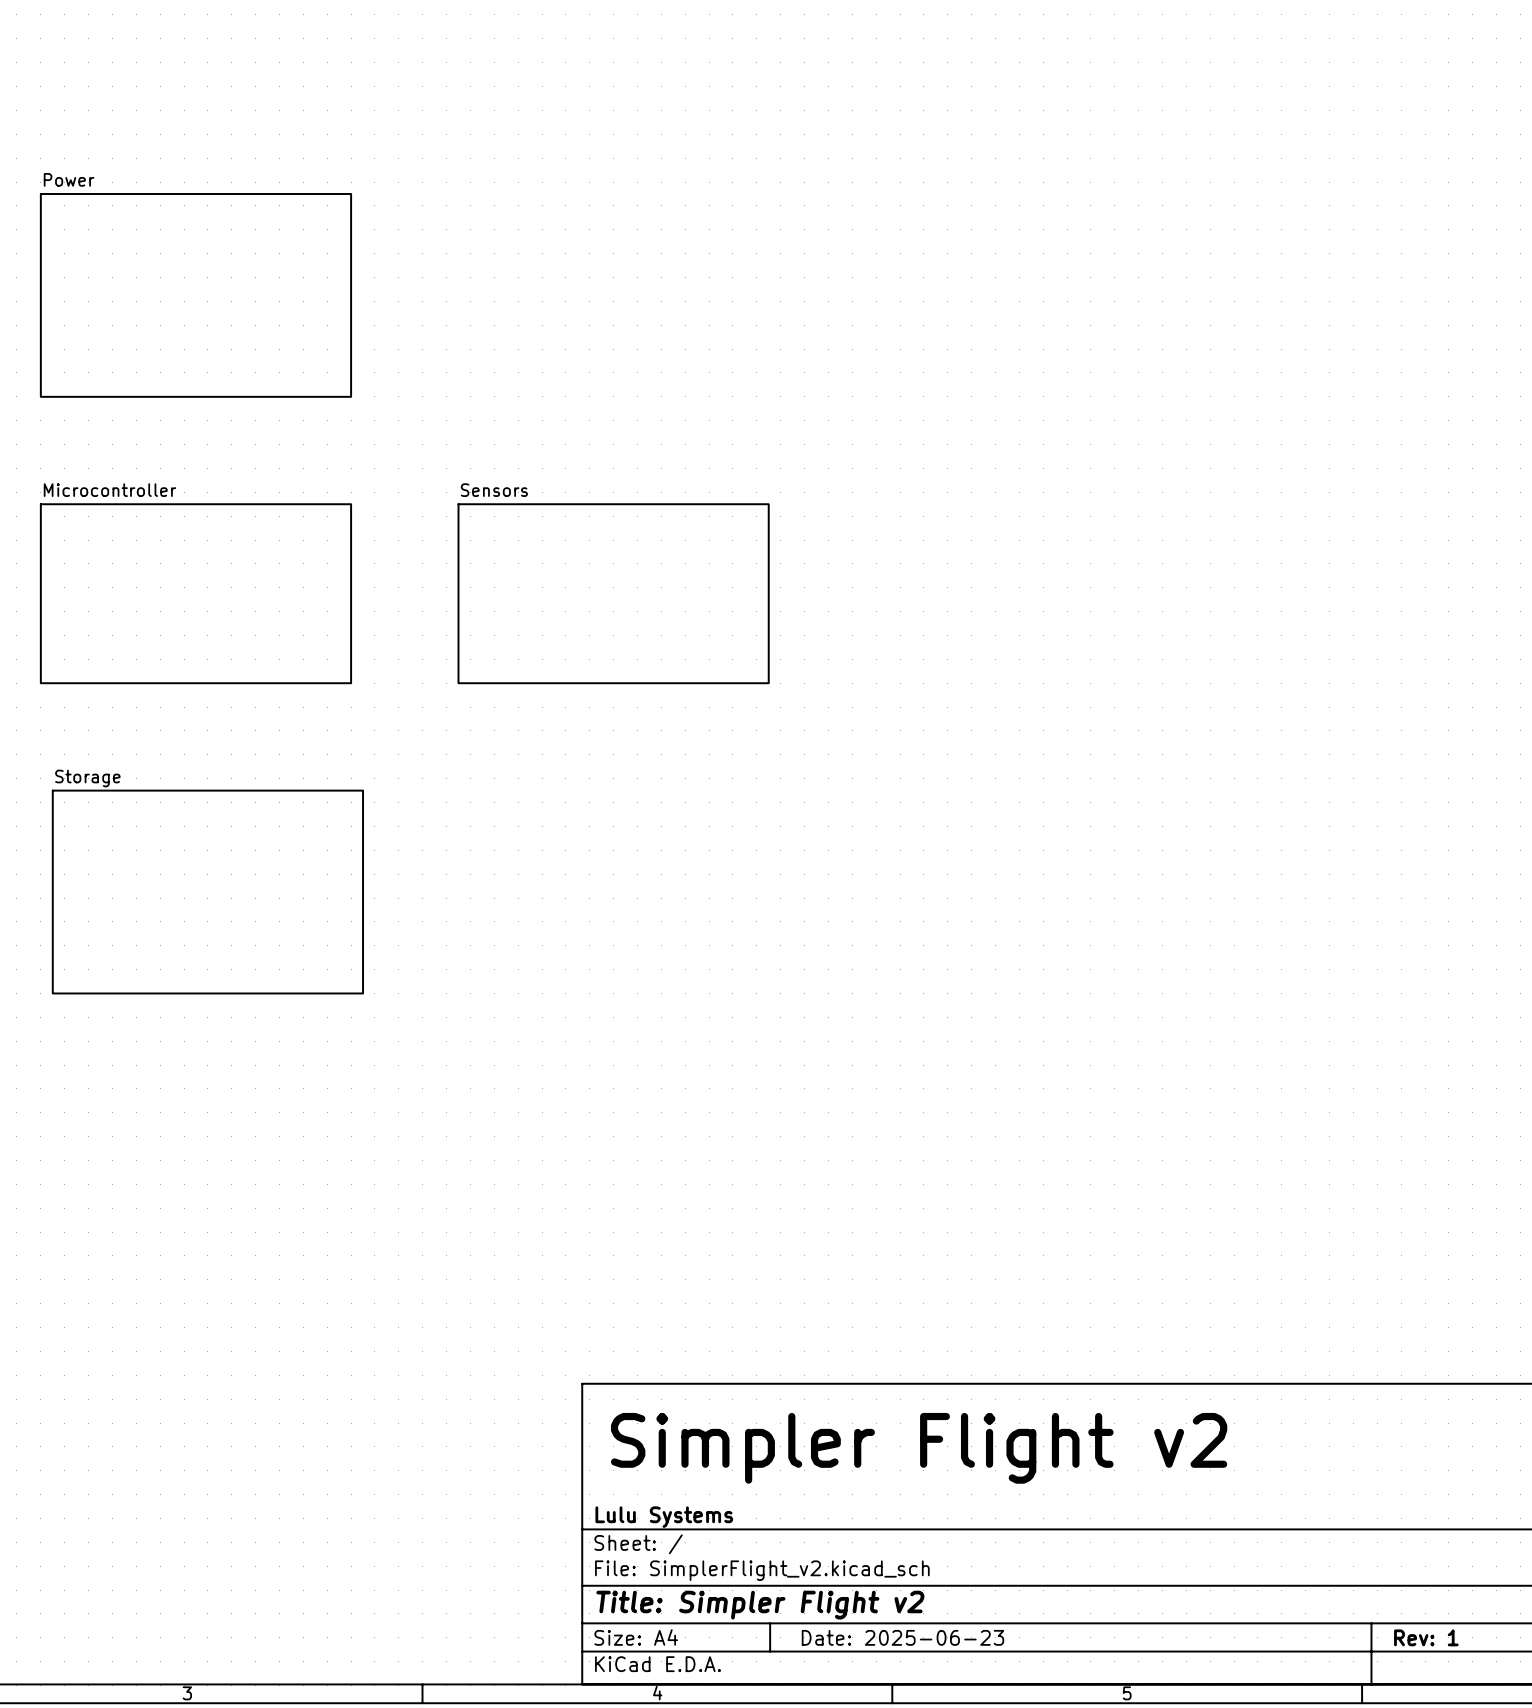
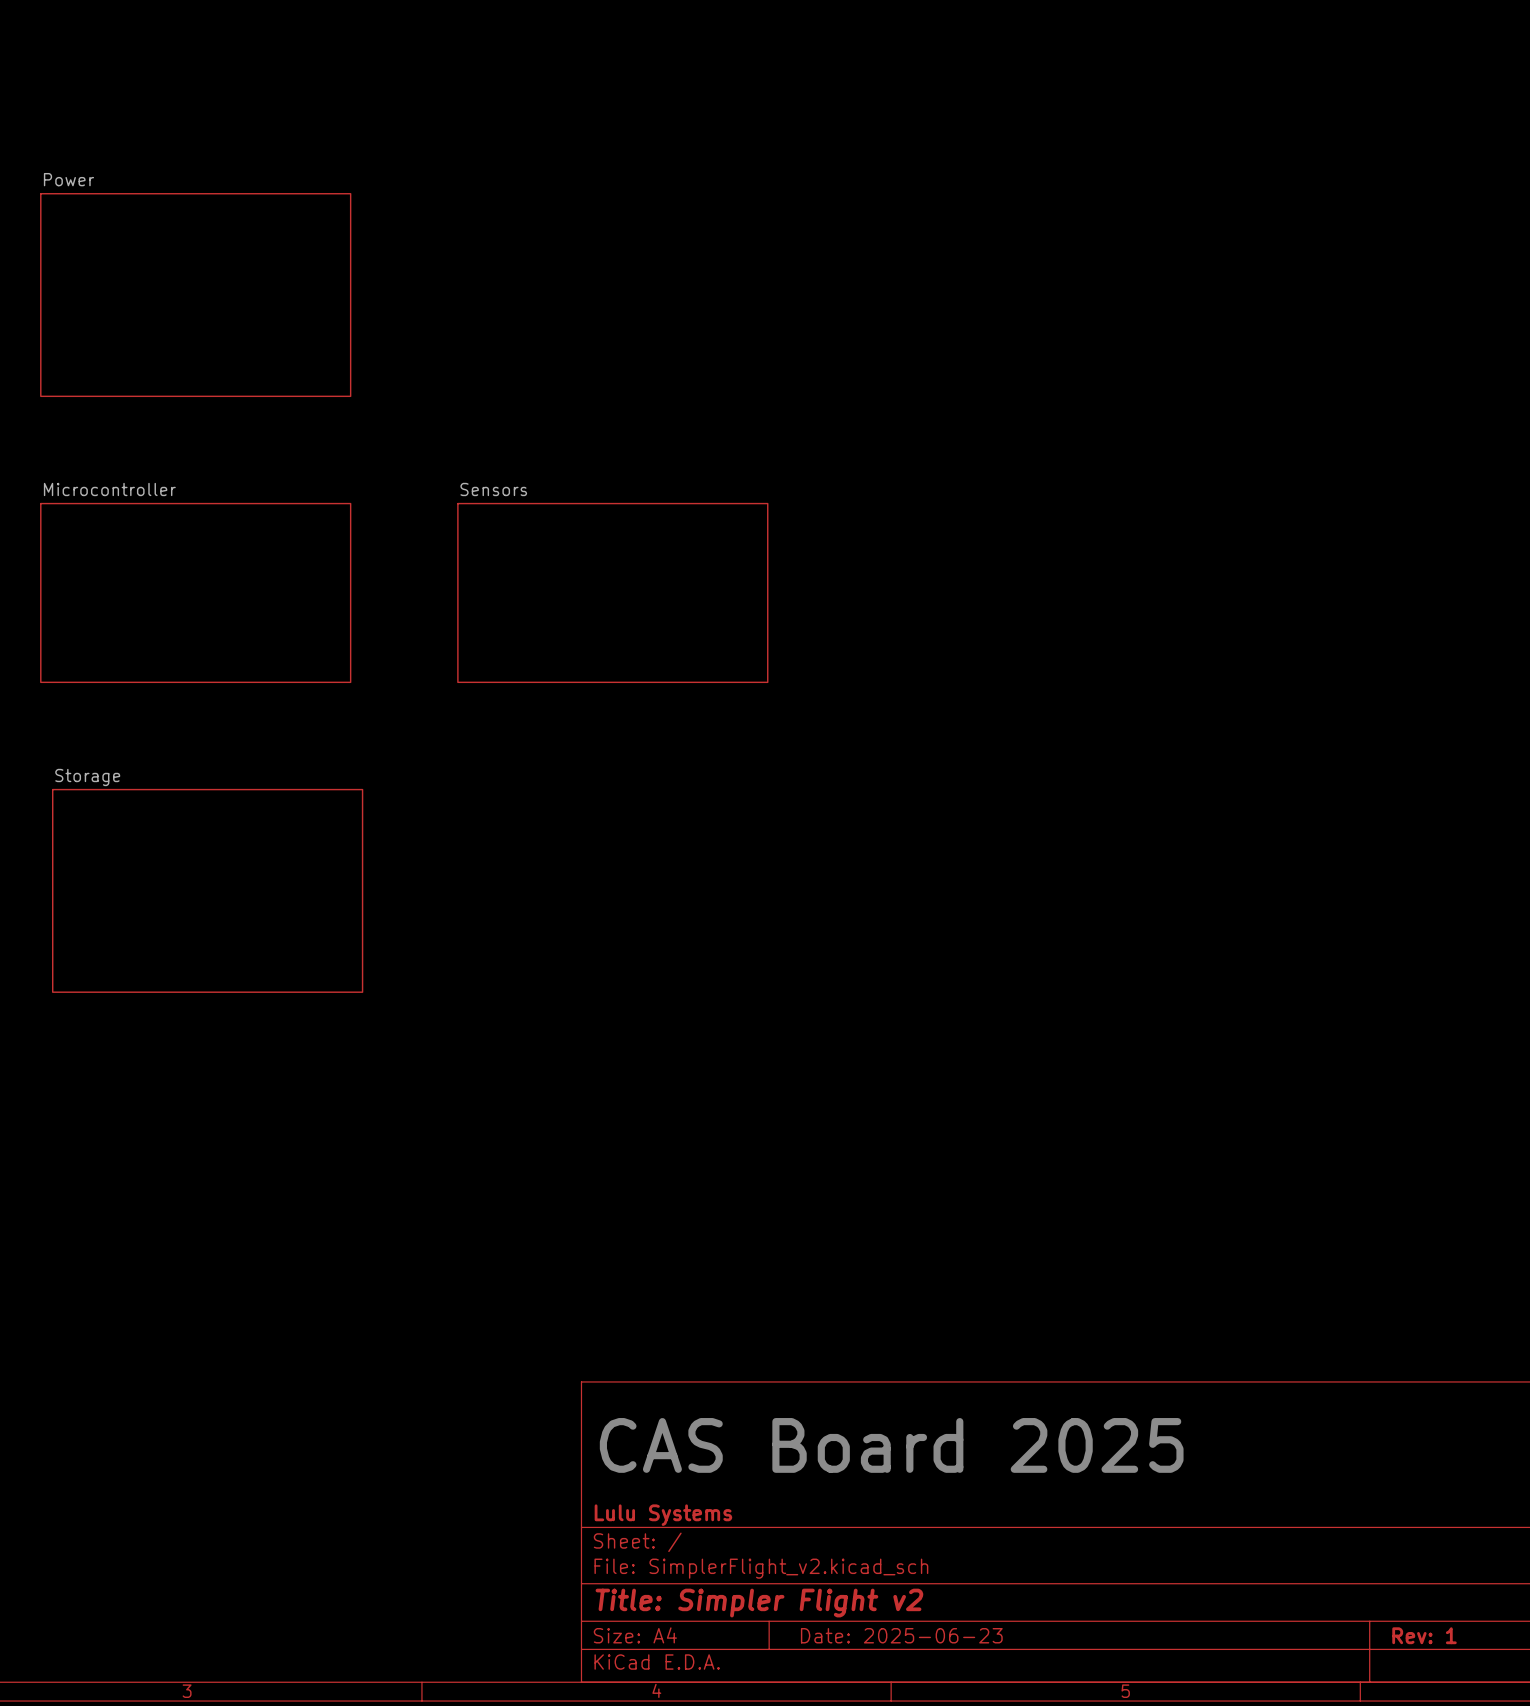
text: none -> CAS Board 2025 (891, 1445)
text: Simpler Flight v2 (919, 1448) -> none

